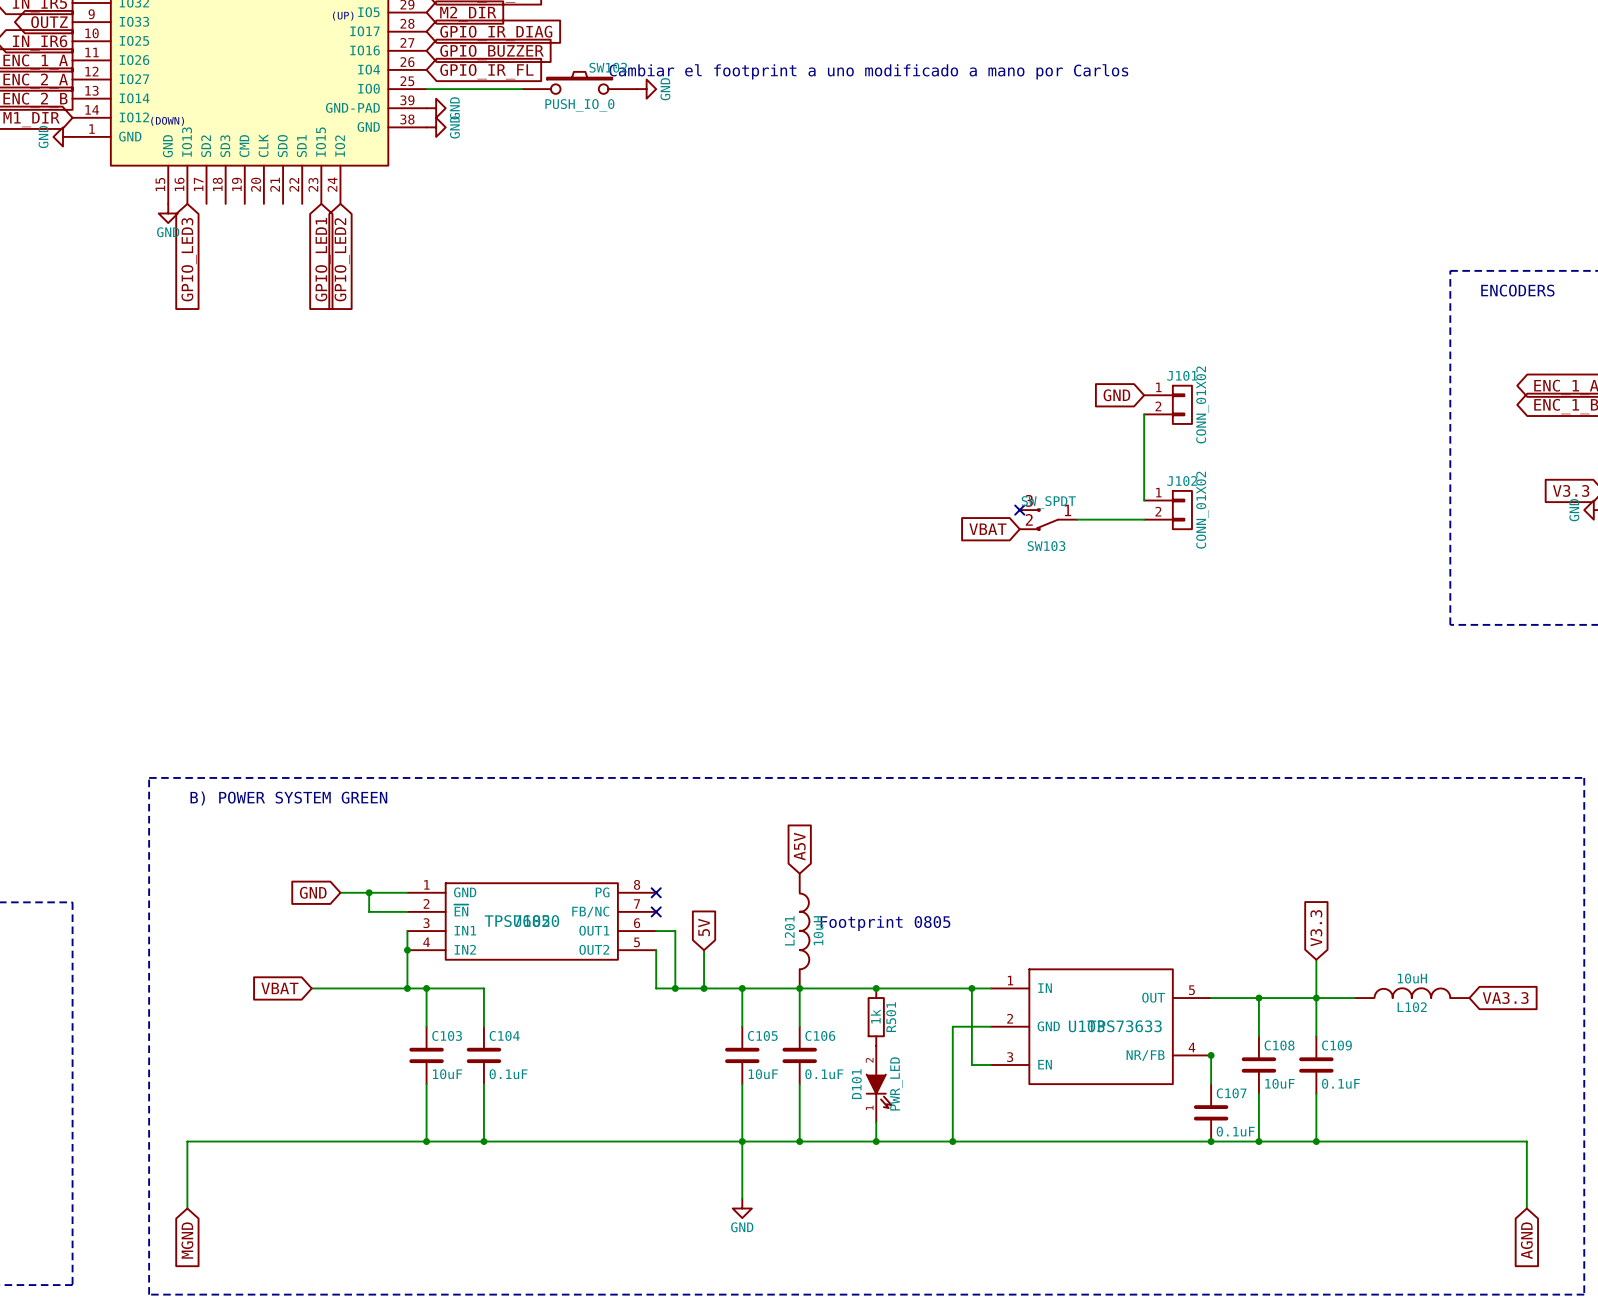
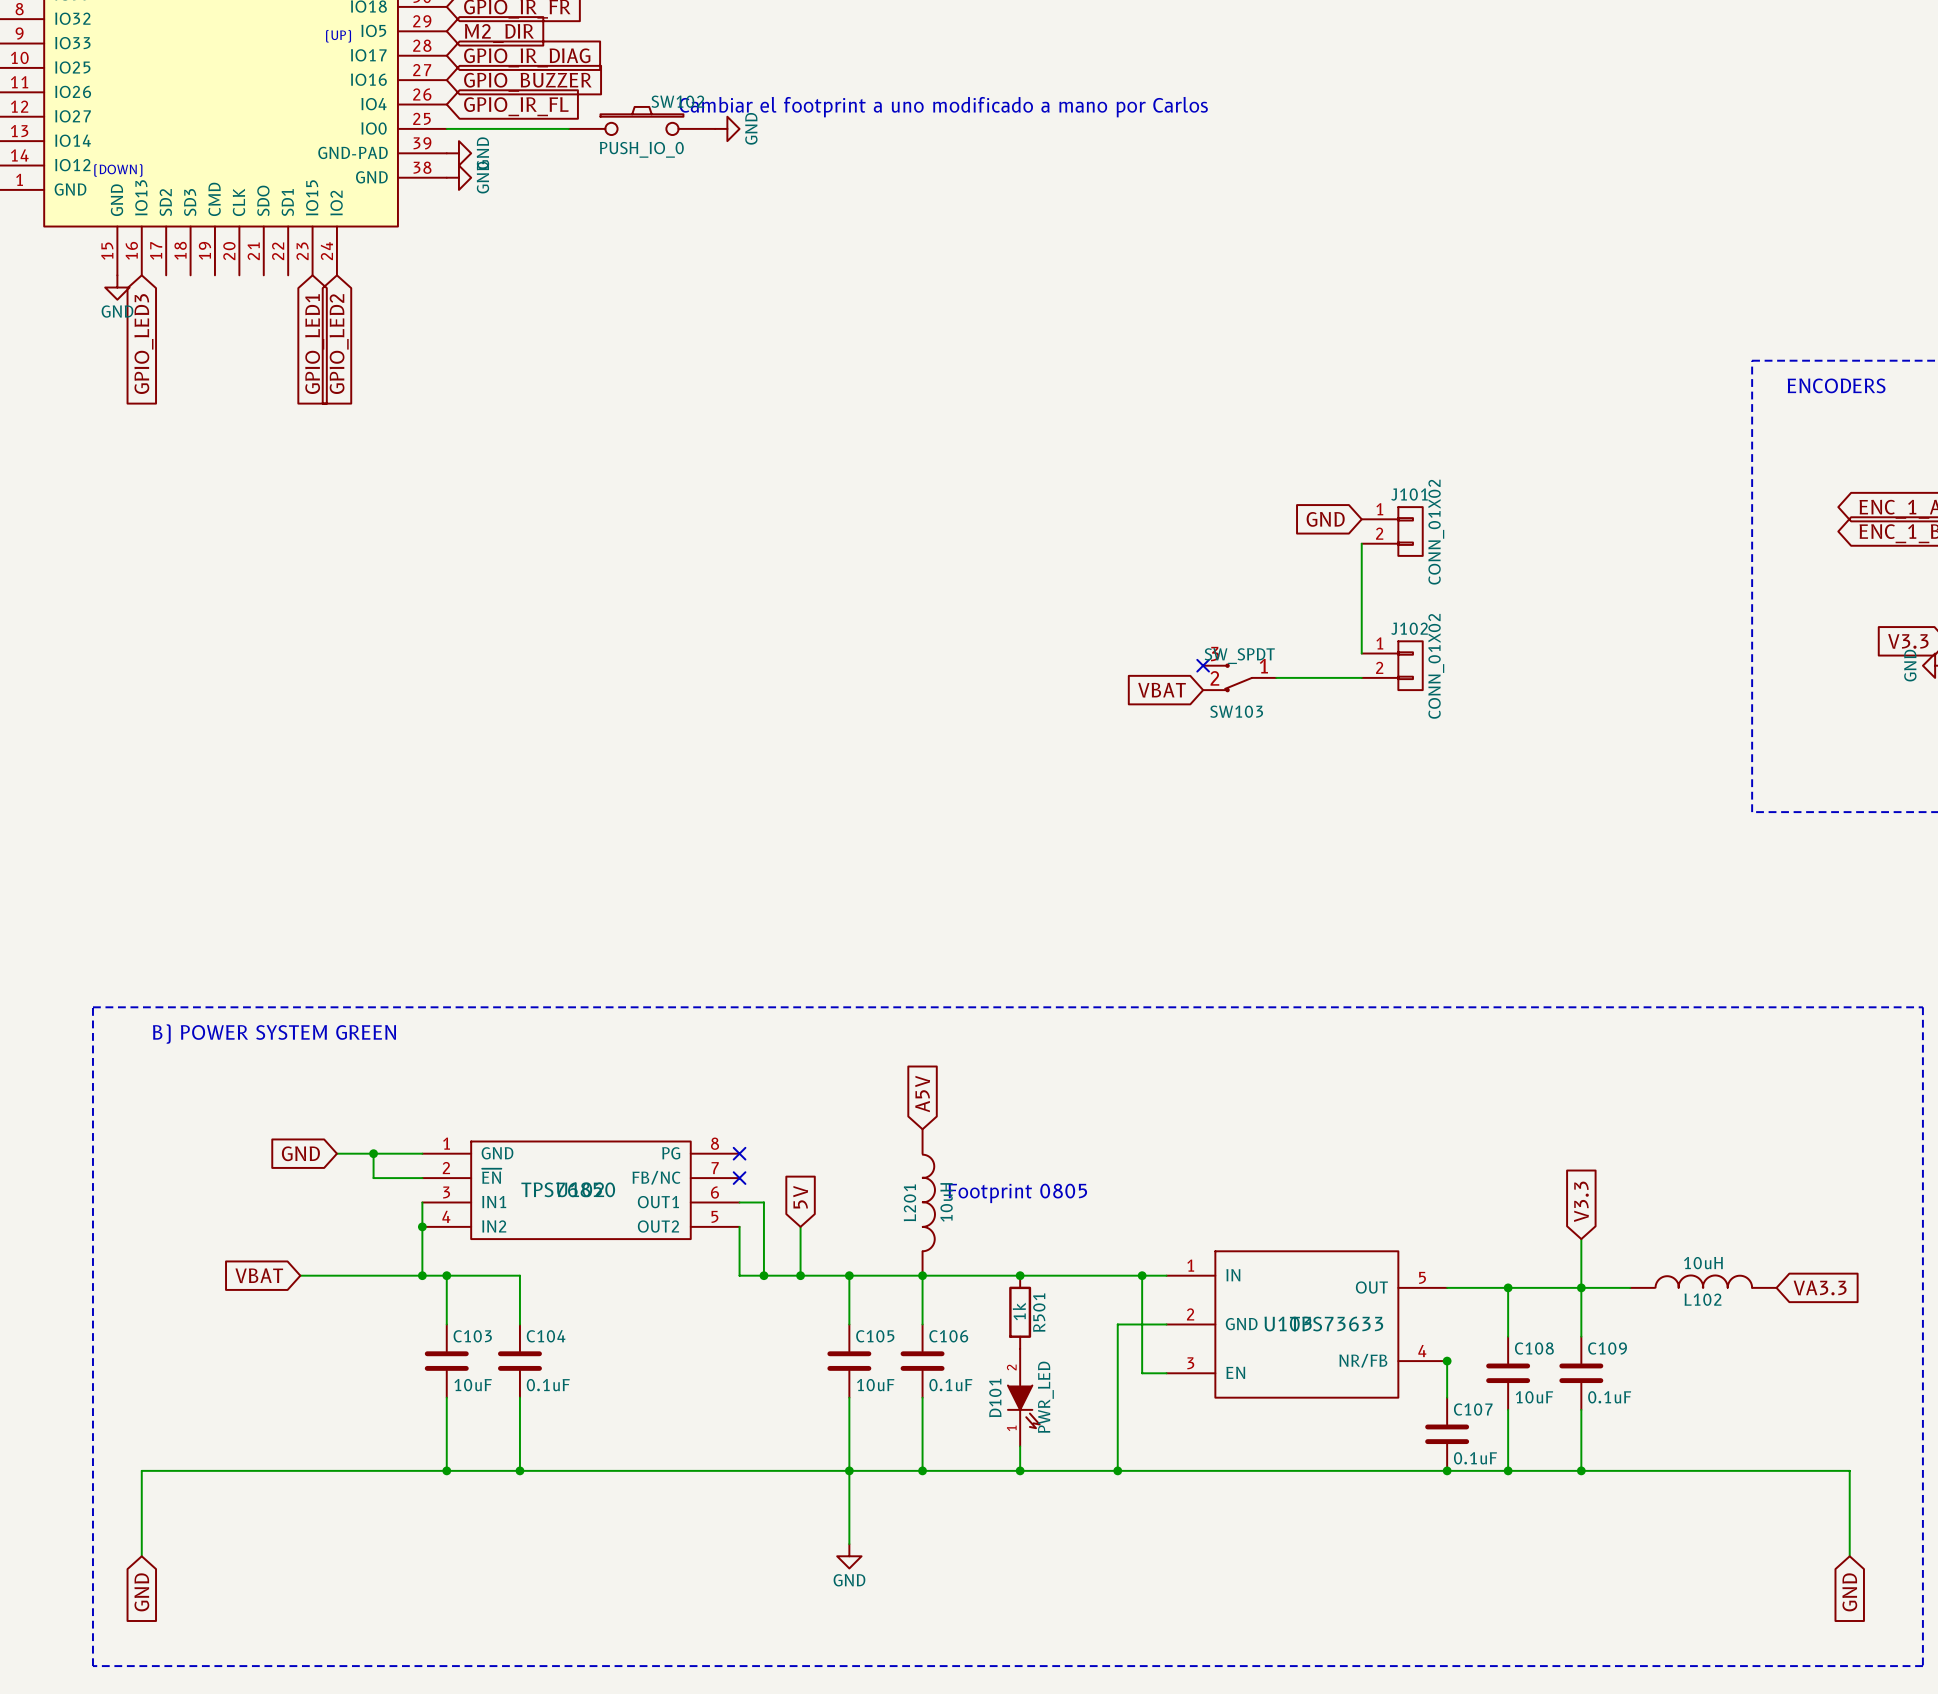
global label: MGND (187, 1240) -> GND (141, 1592)
global label: AGND (1526, 1240) -> GND (1849, 1592)

